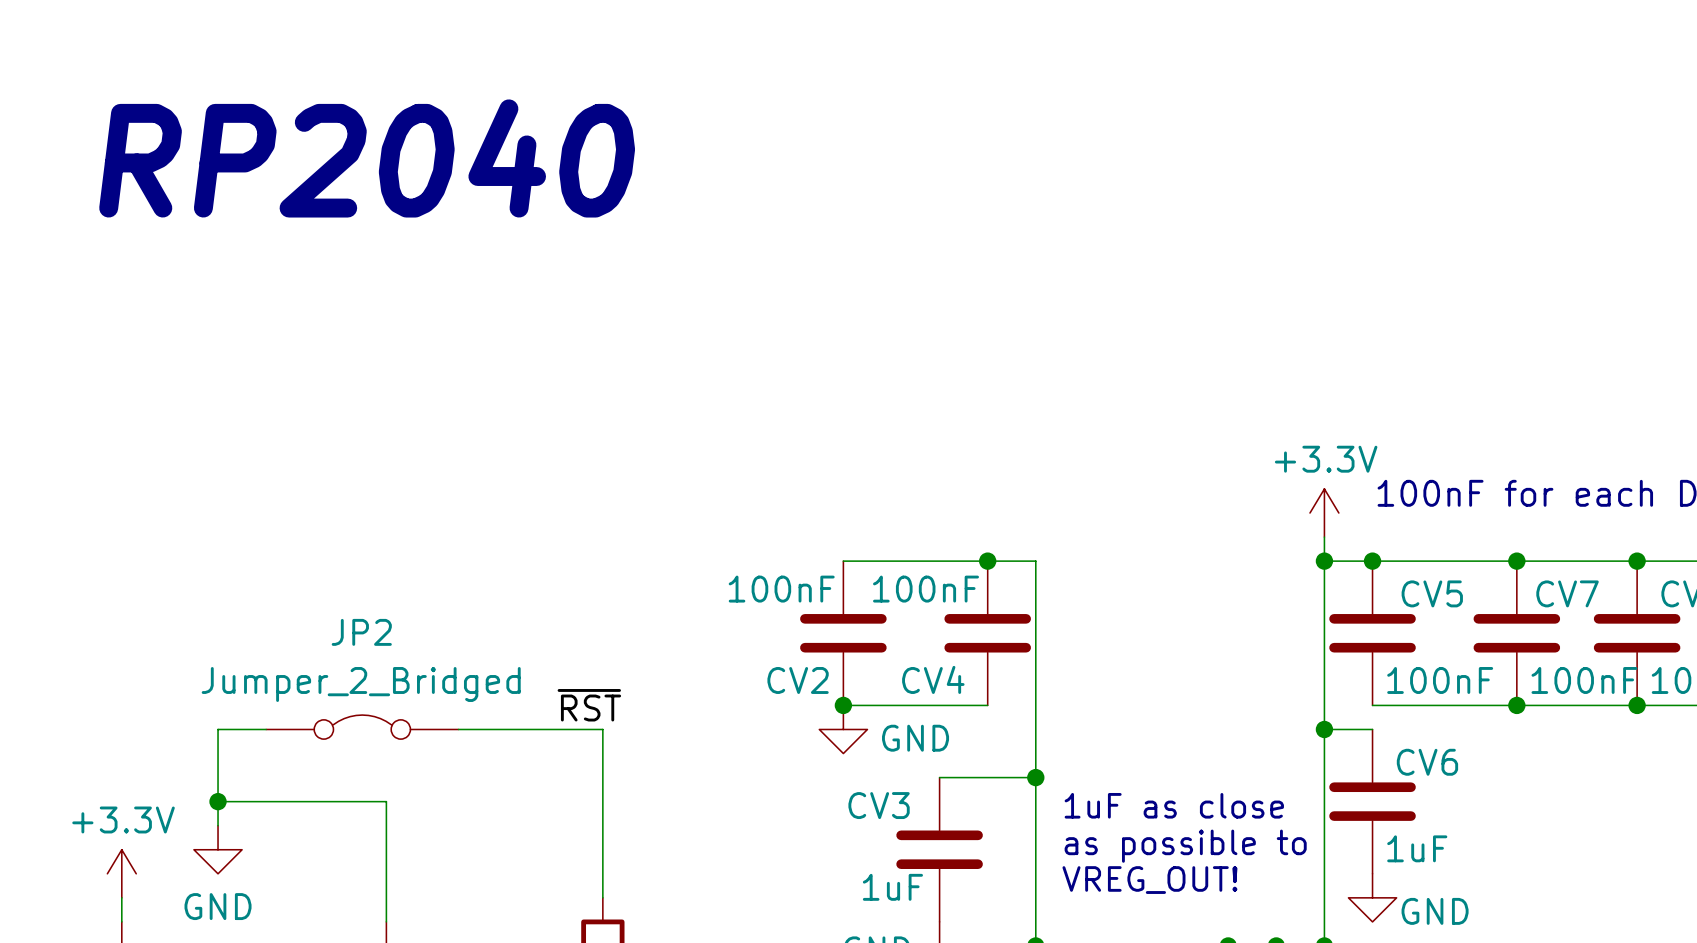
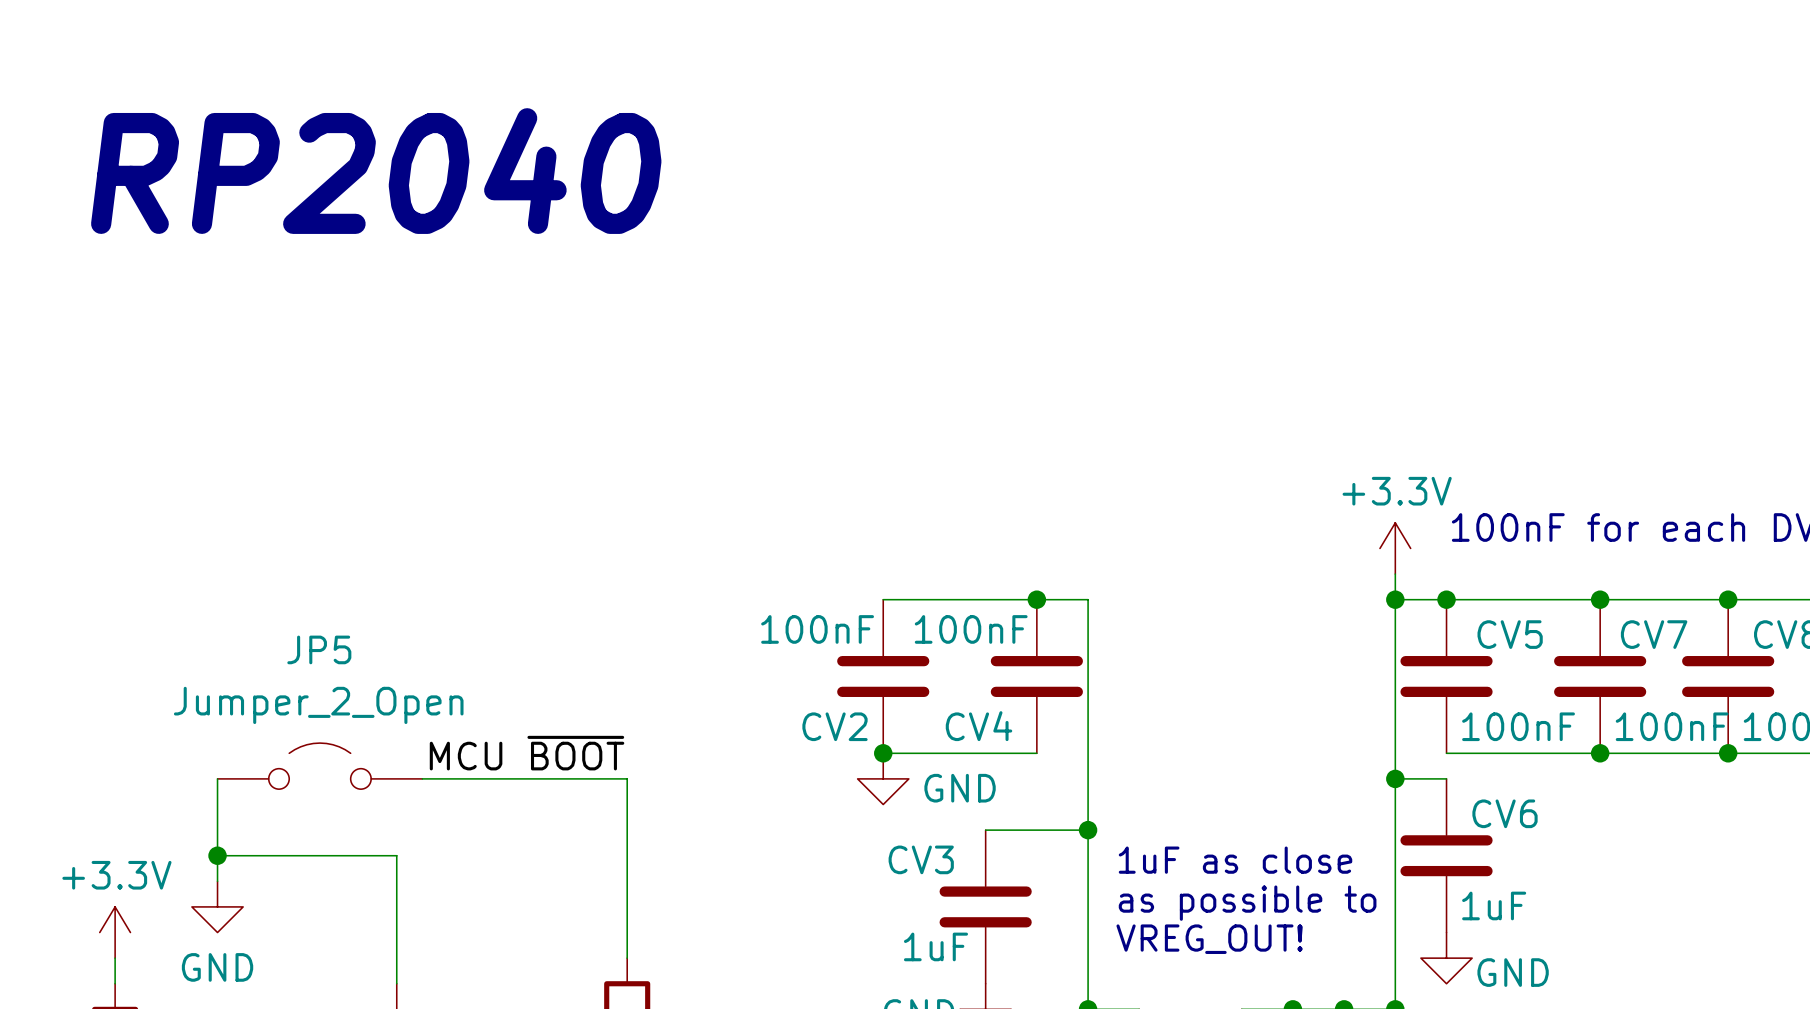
label: none -> MCU ~{BOOT} (527, 753)
label: ~{RST} (589, 705) -> none
JP5: none -> Jumper_2_Open (319, 766)
JP2: Jumper_2_Bridged (362, 727) -> none

